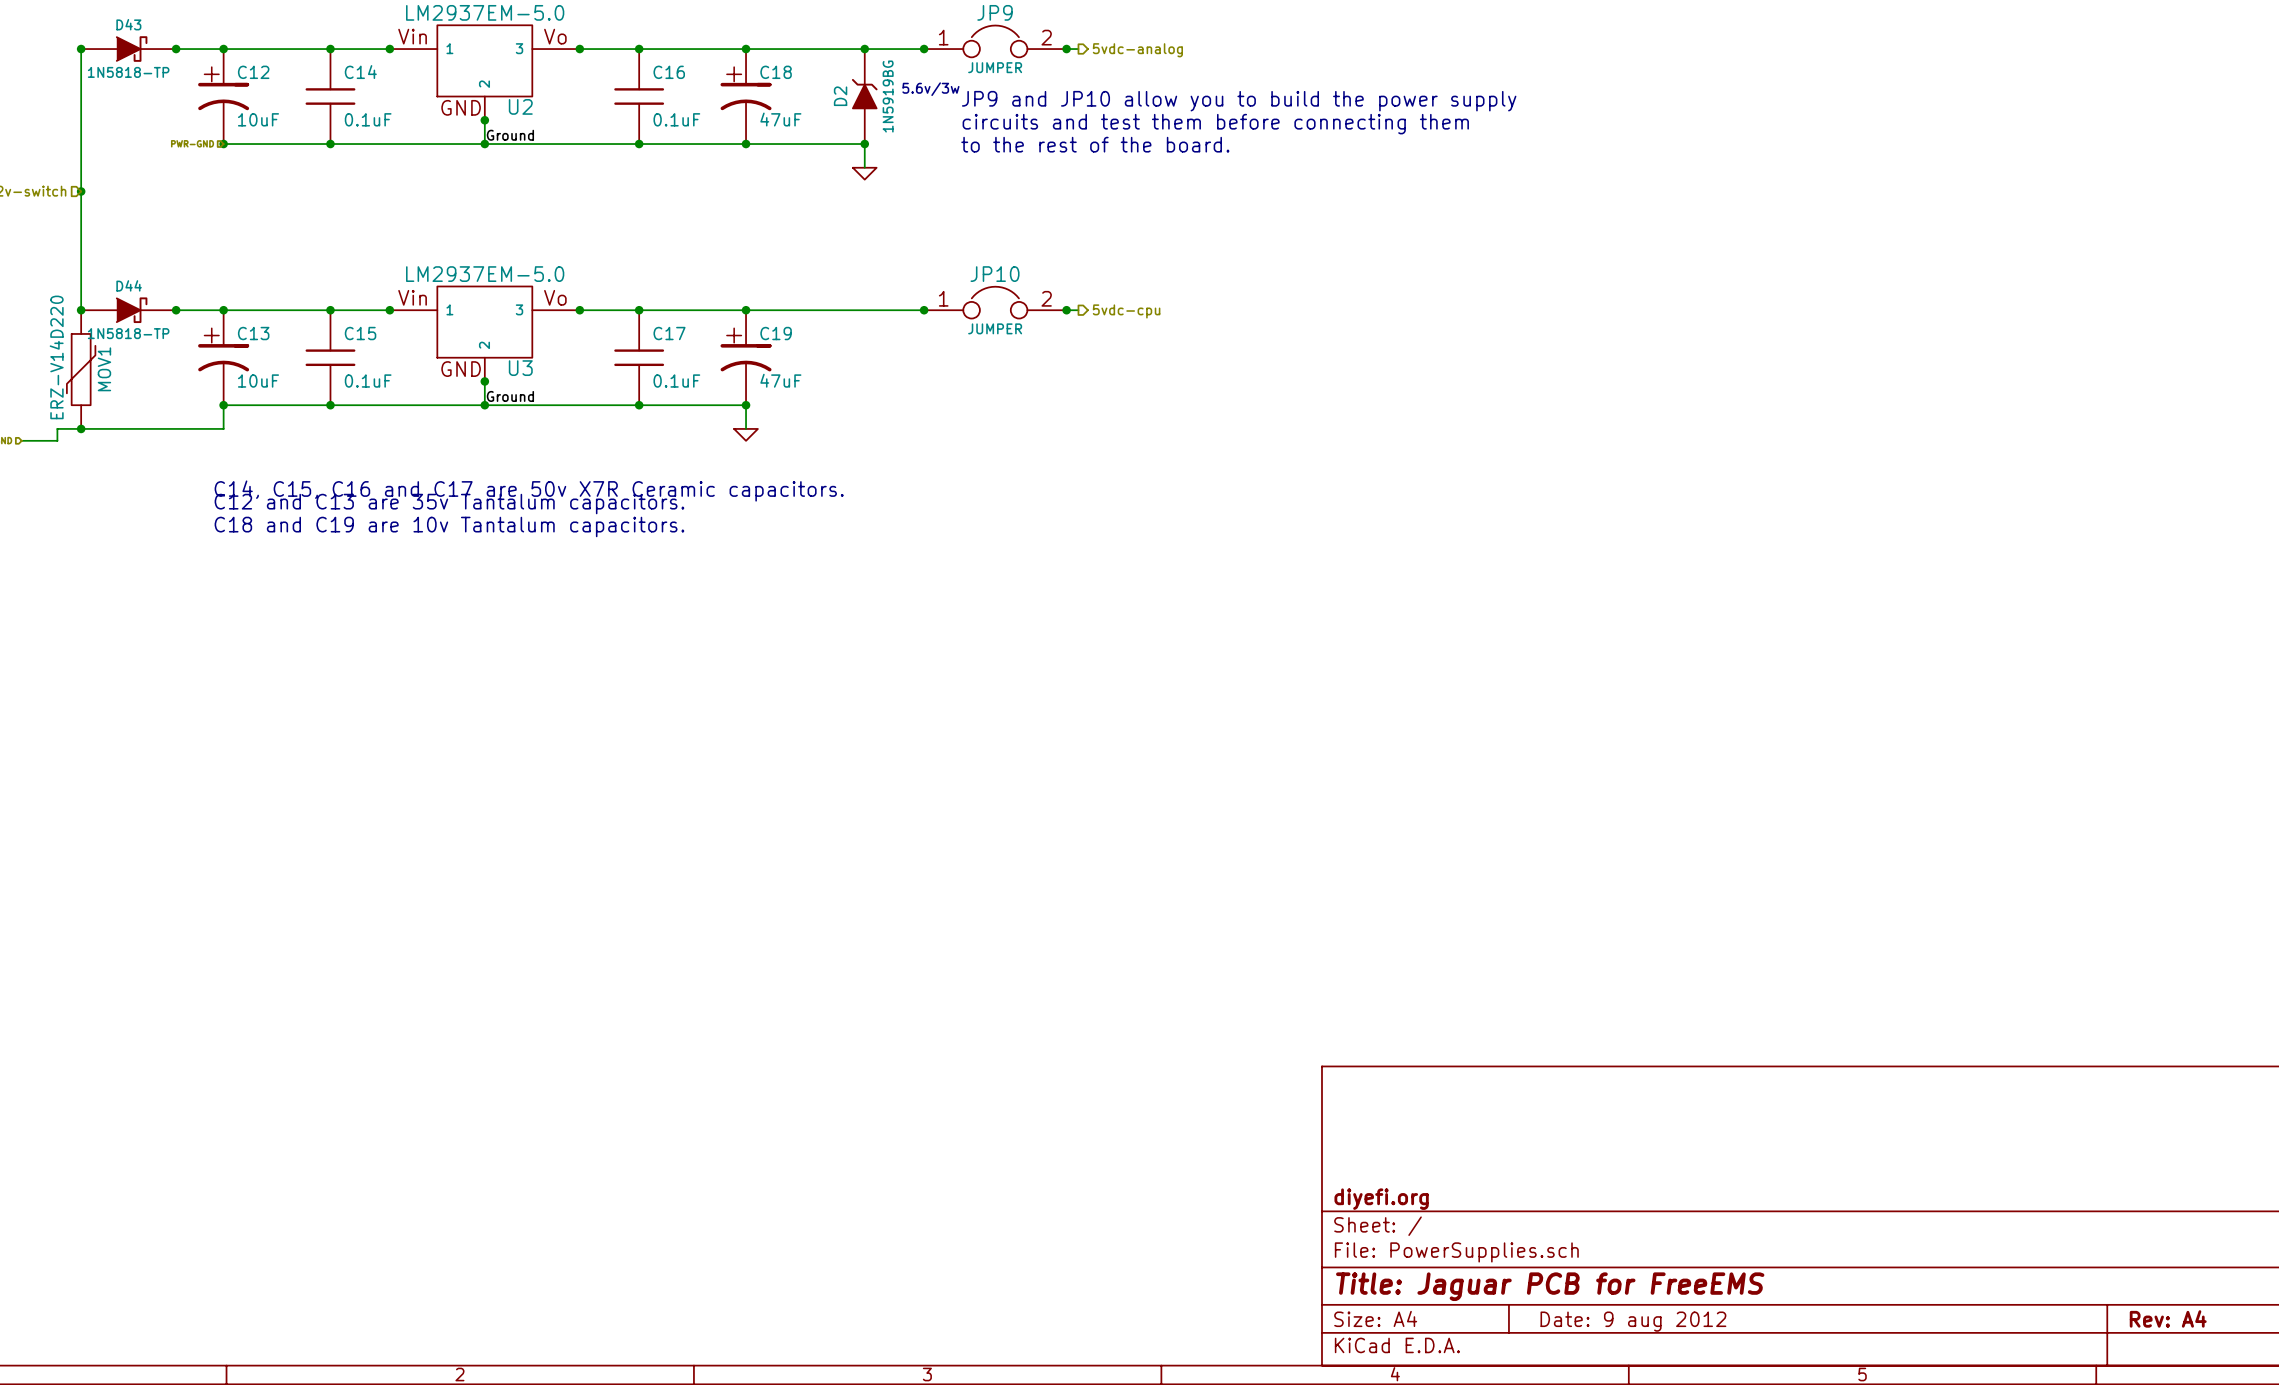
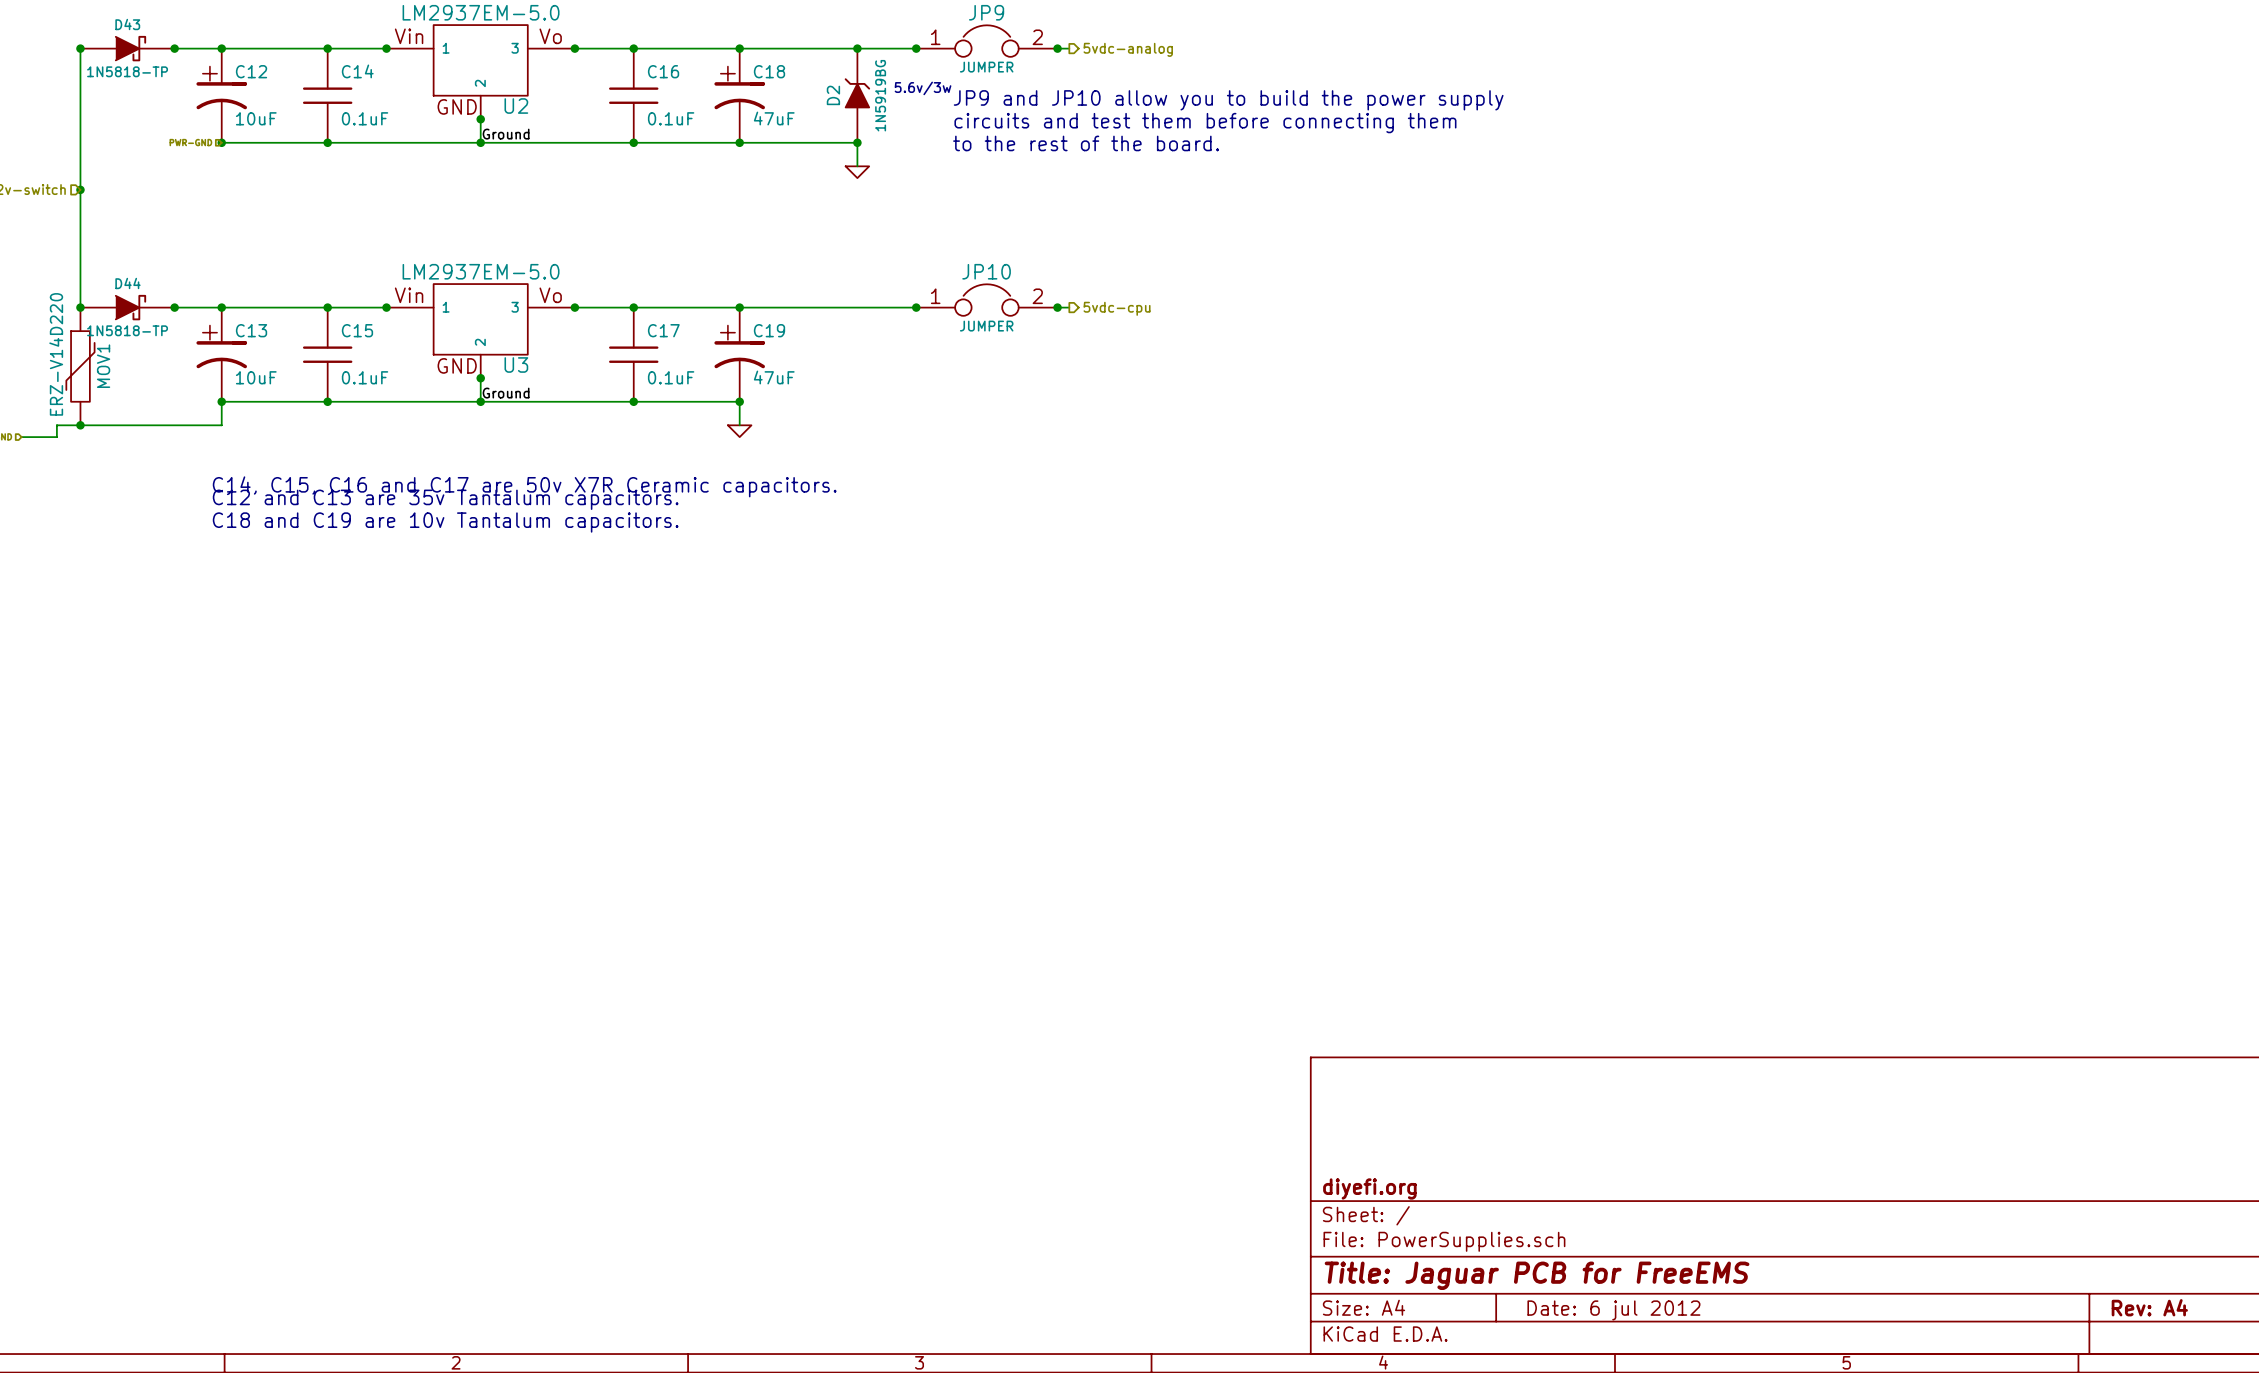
title block: Date: 9 aug 2012 (1633, 1321) -> Date: 6 jul 2012 (1613, 1310)

